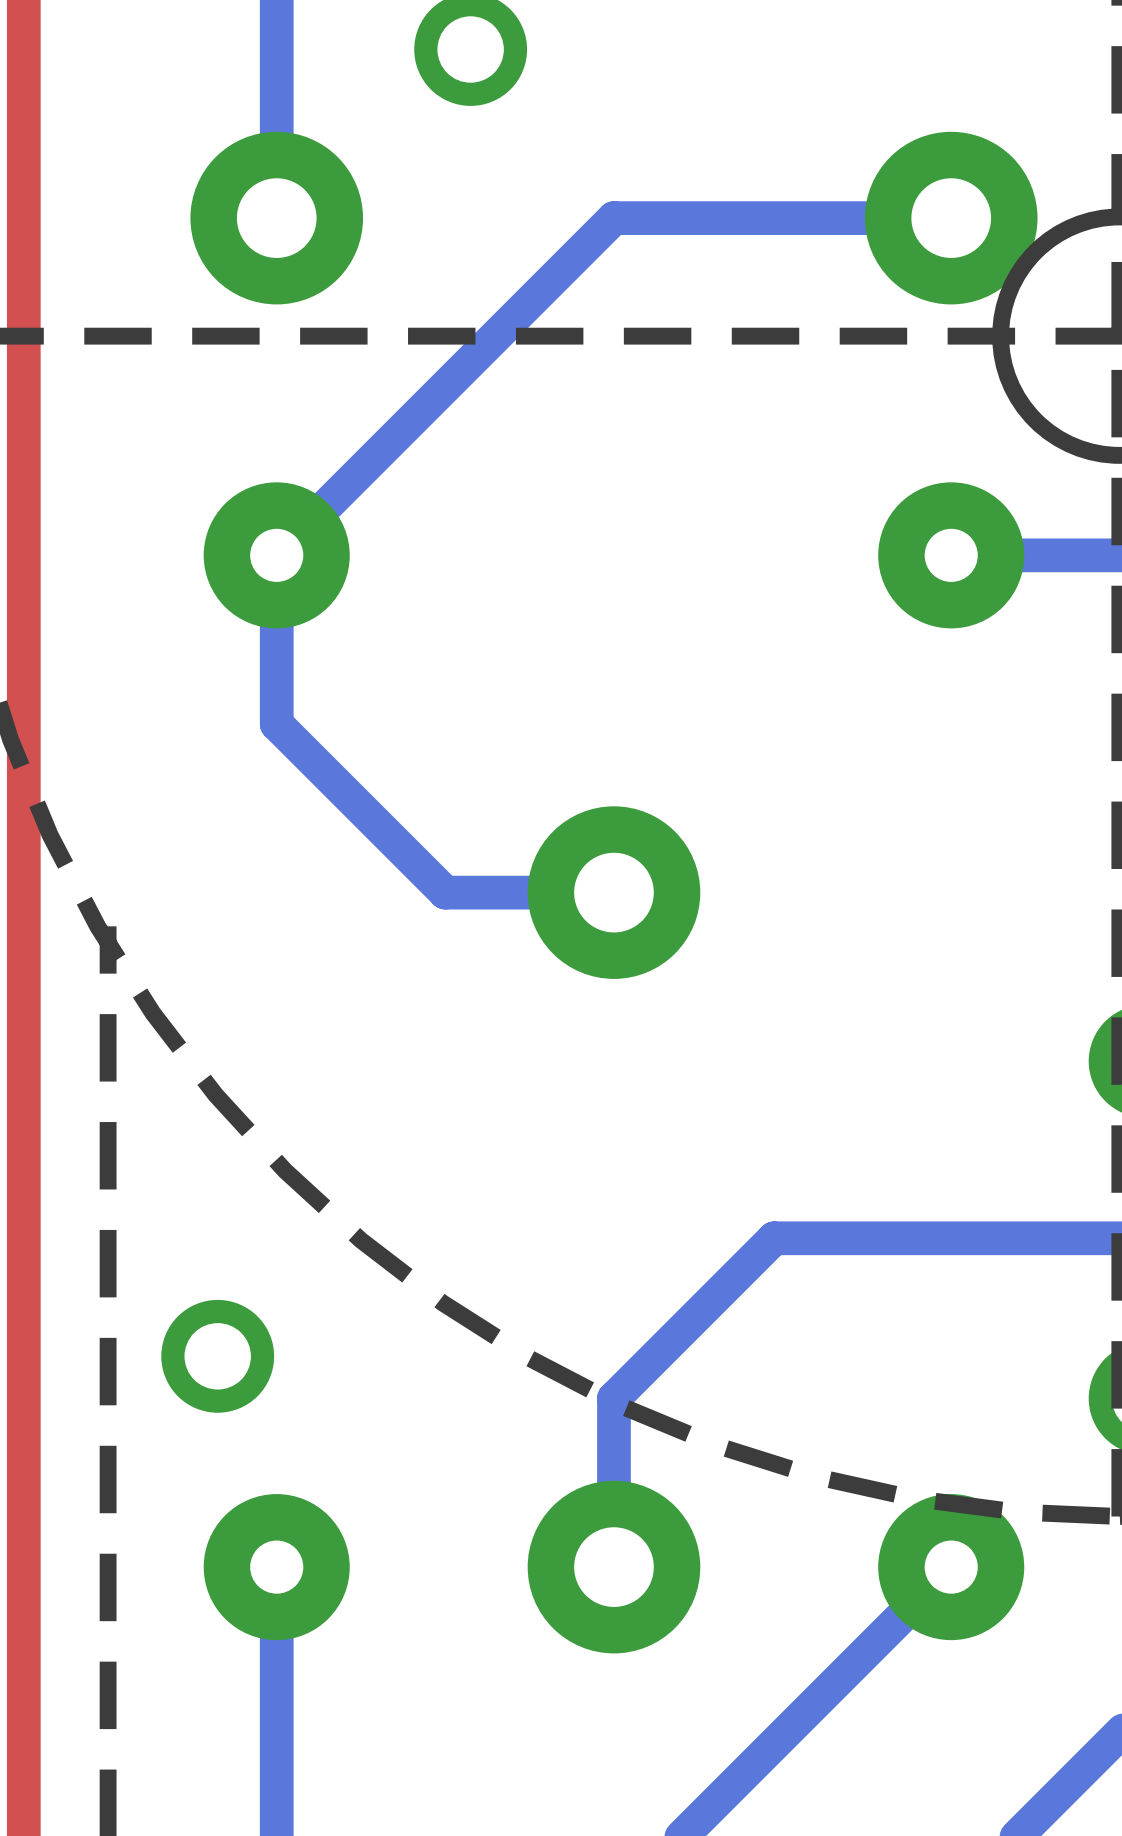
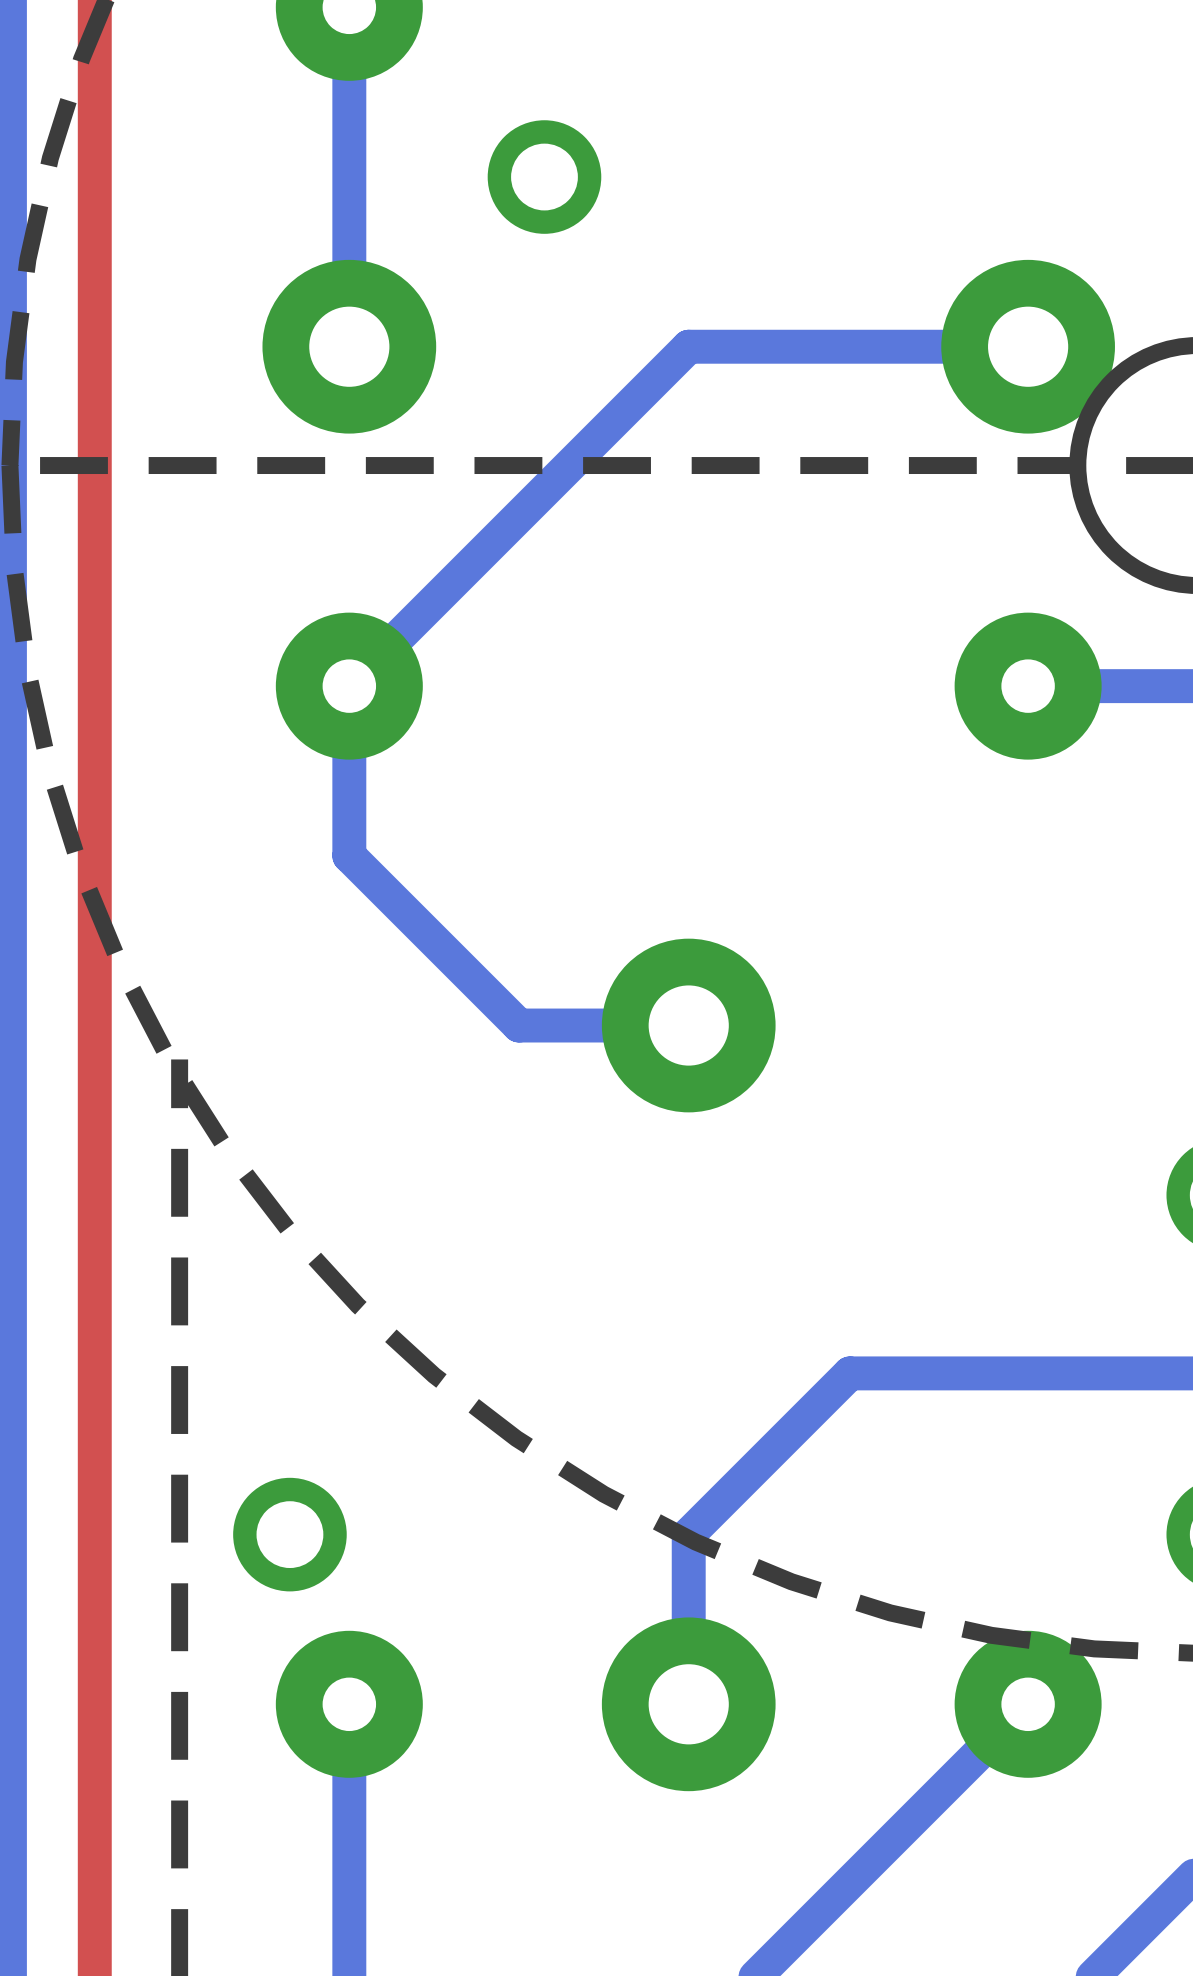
via position: (217, 1356) -> (289, 1534)

